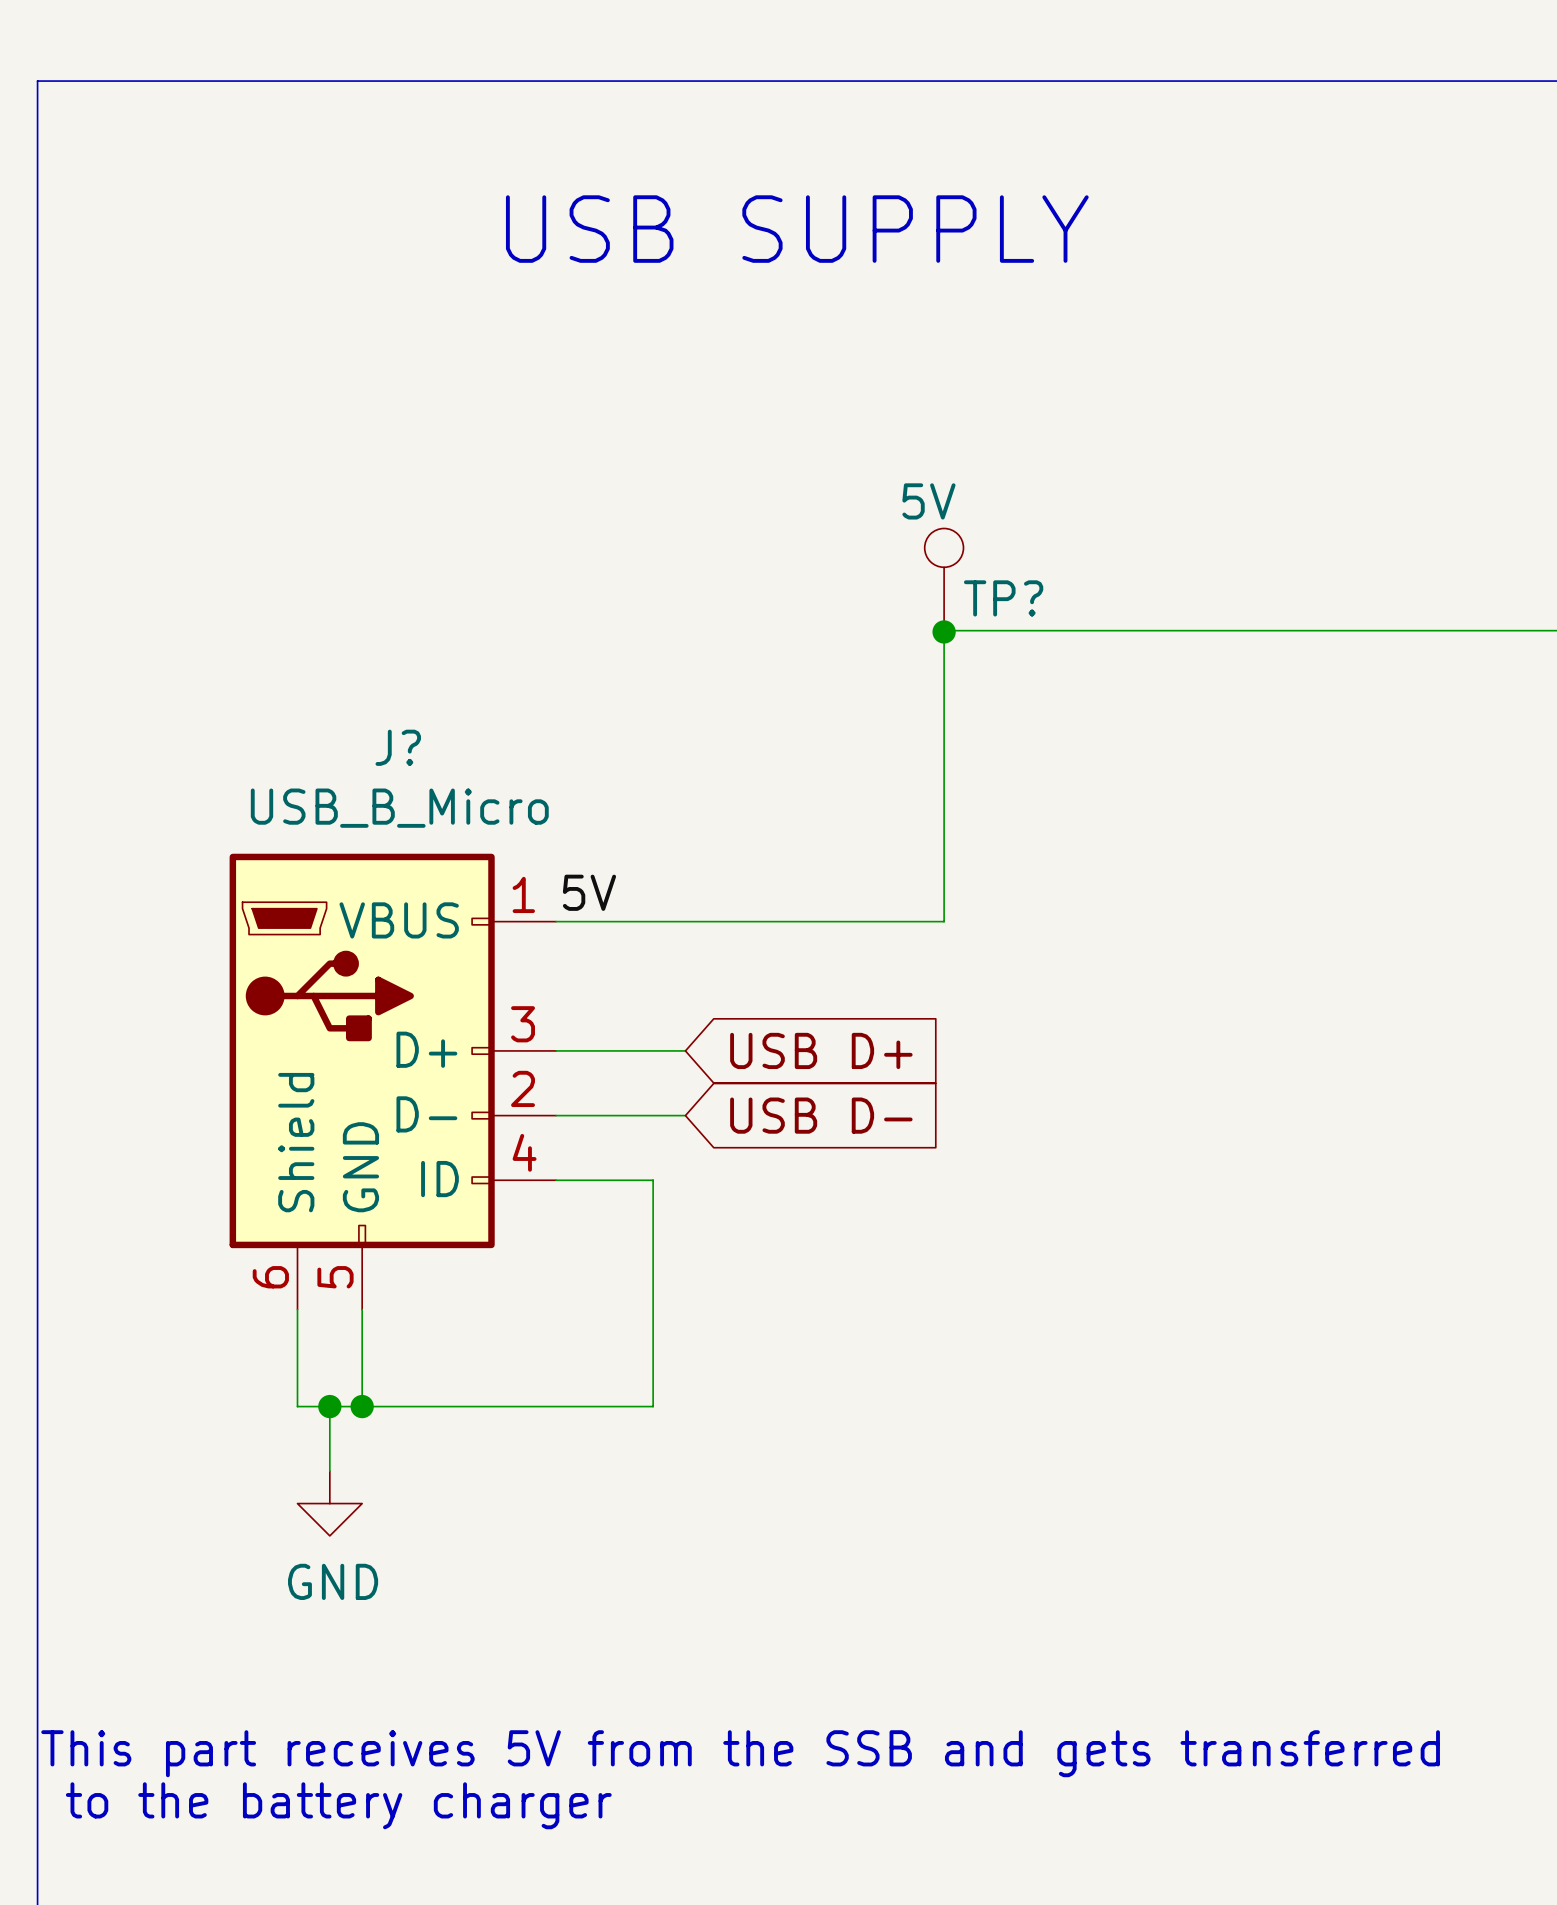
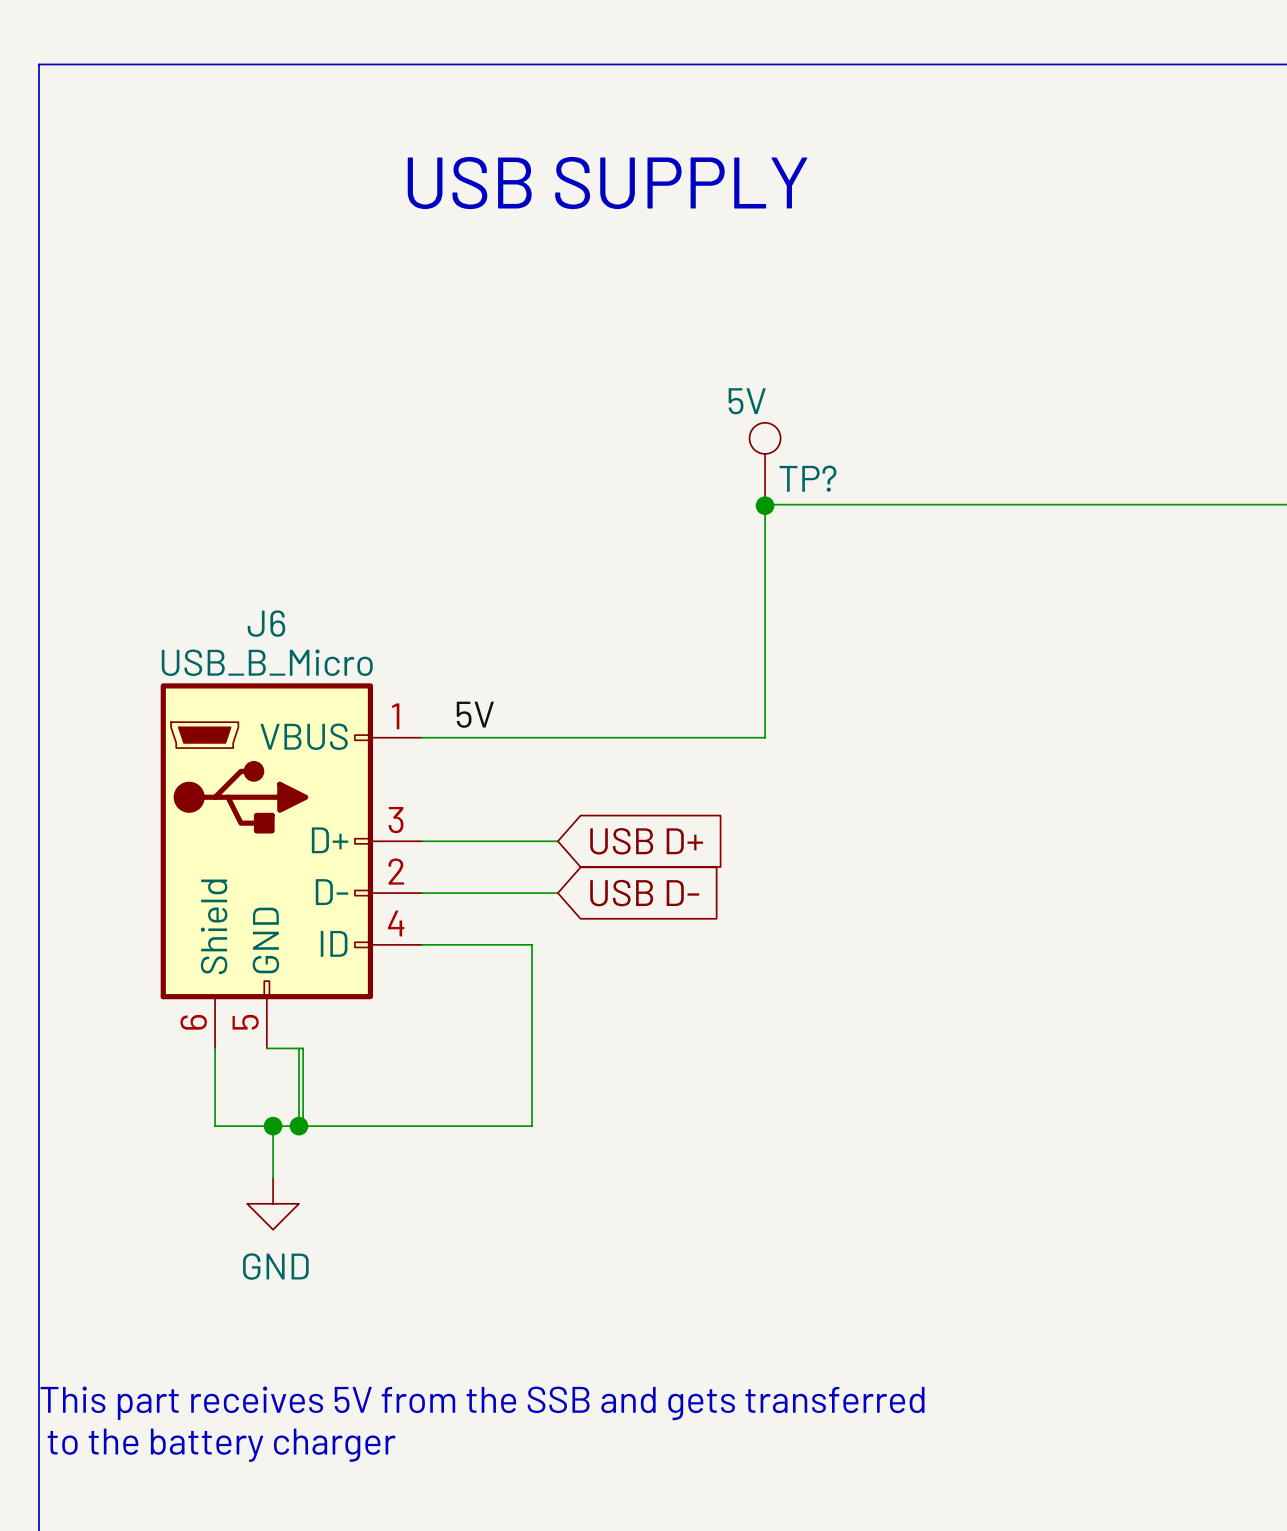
J6: none -> USB_B_Micro (291, 865)
J?: USB_B_Micro (392, 1081) -> none
wire: (297, 1309) (297, 1406) -> (215, 1048) (215, 1126) (247, 1126)
wire: none -> (266, 1048) (303, 1048) (303, 1126)

